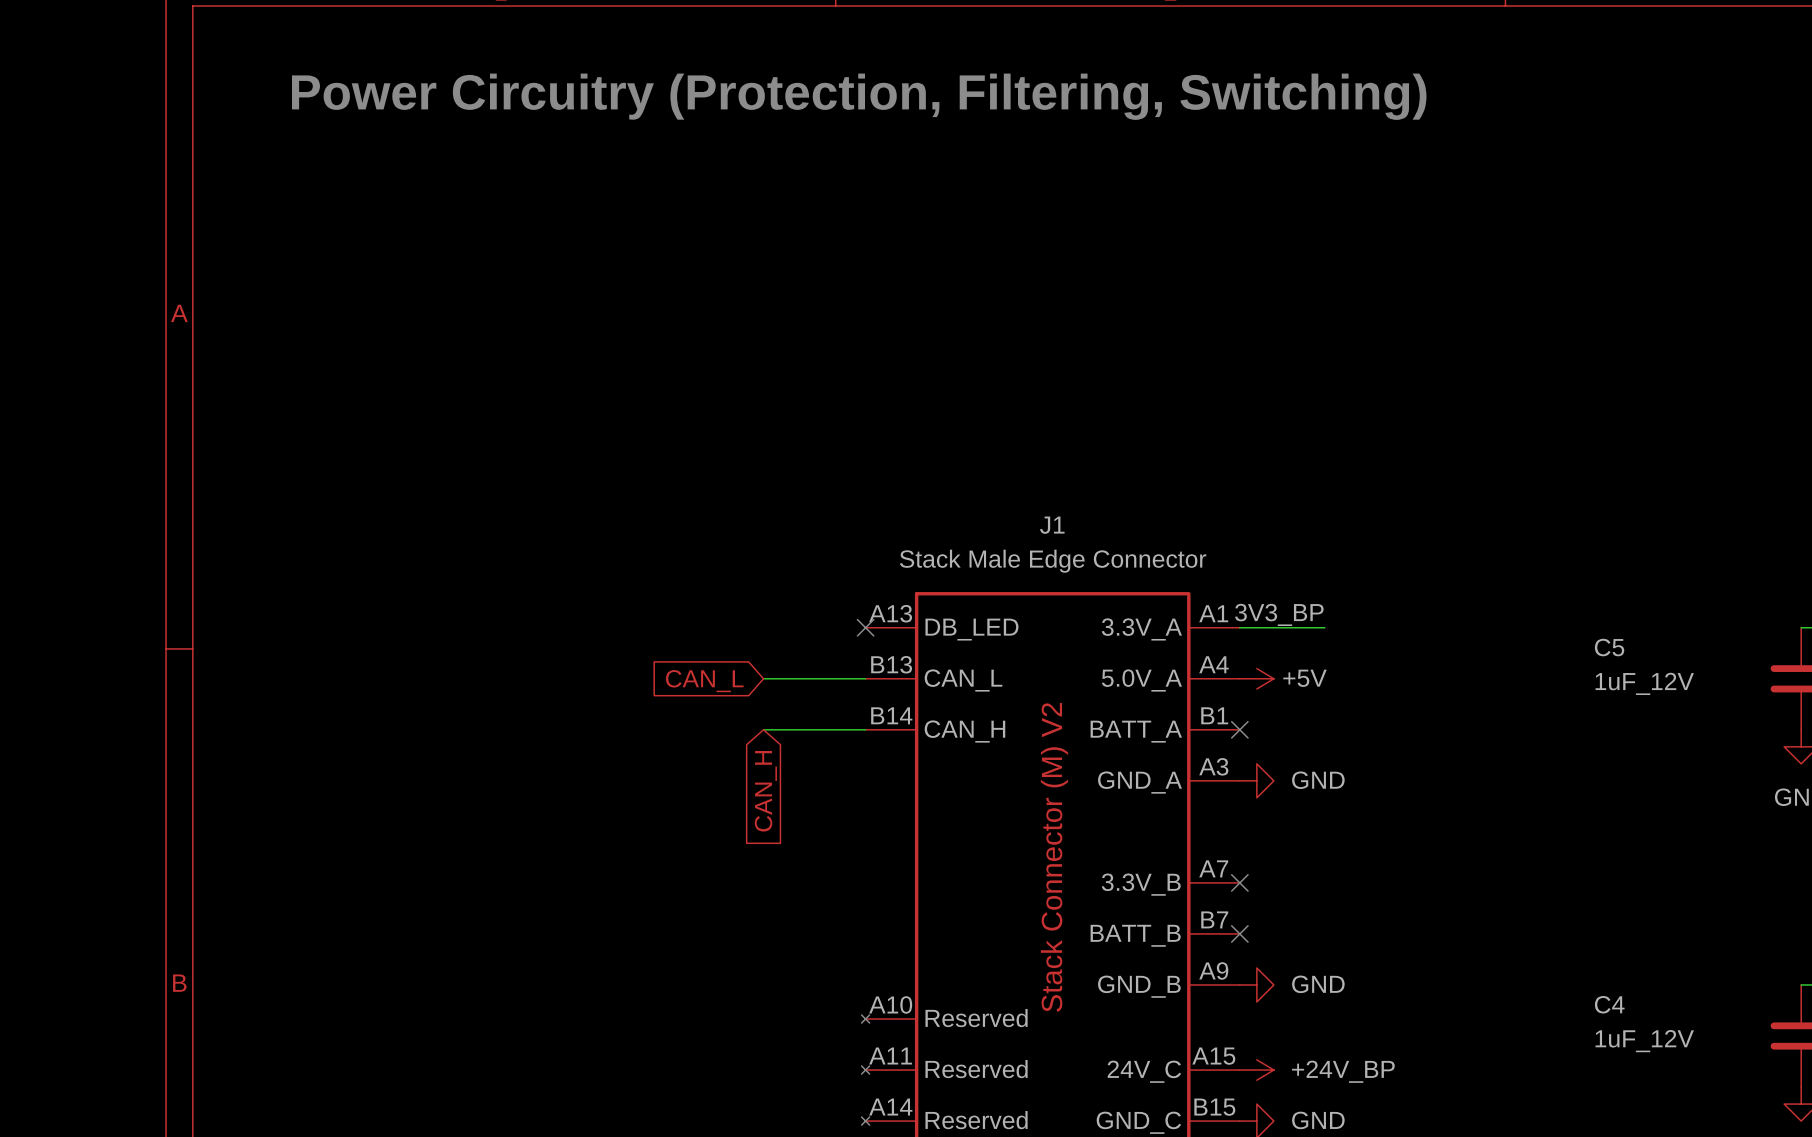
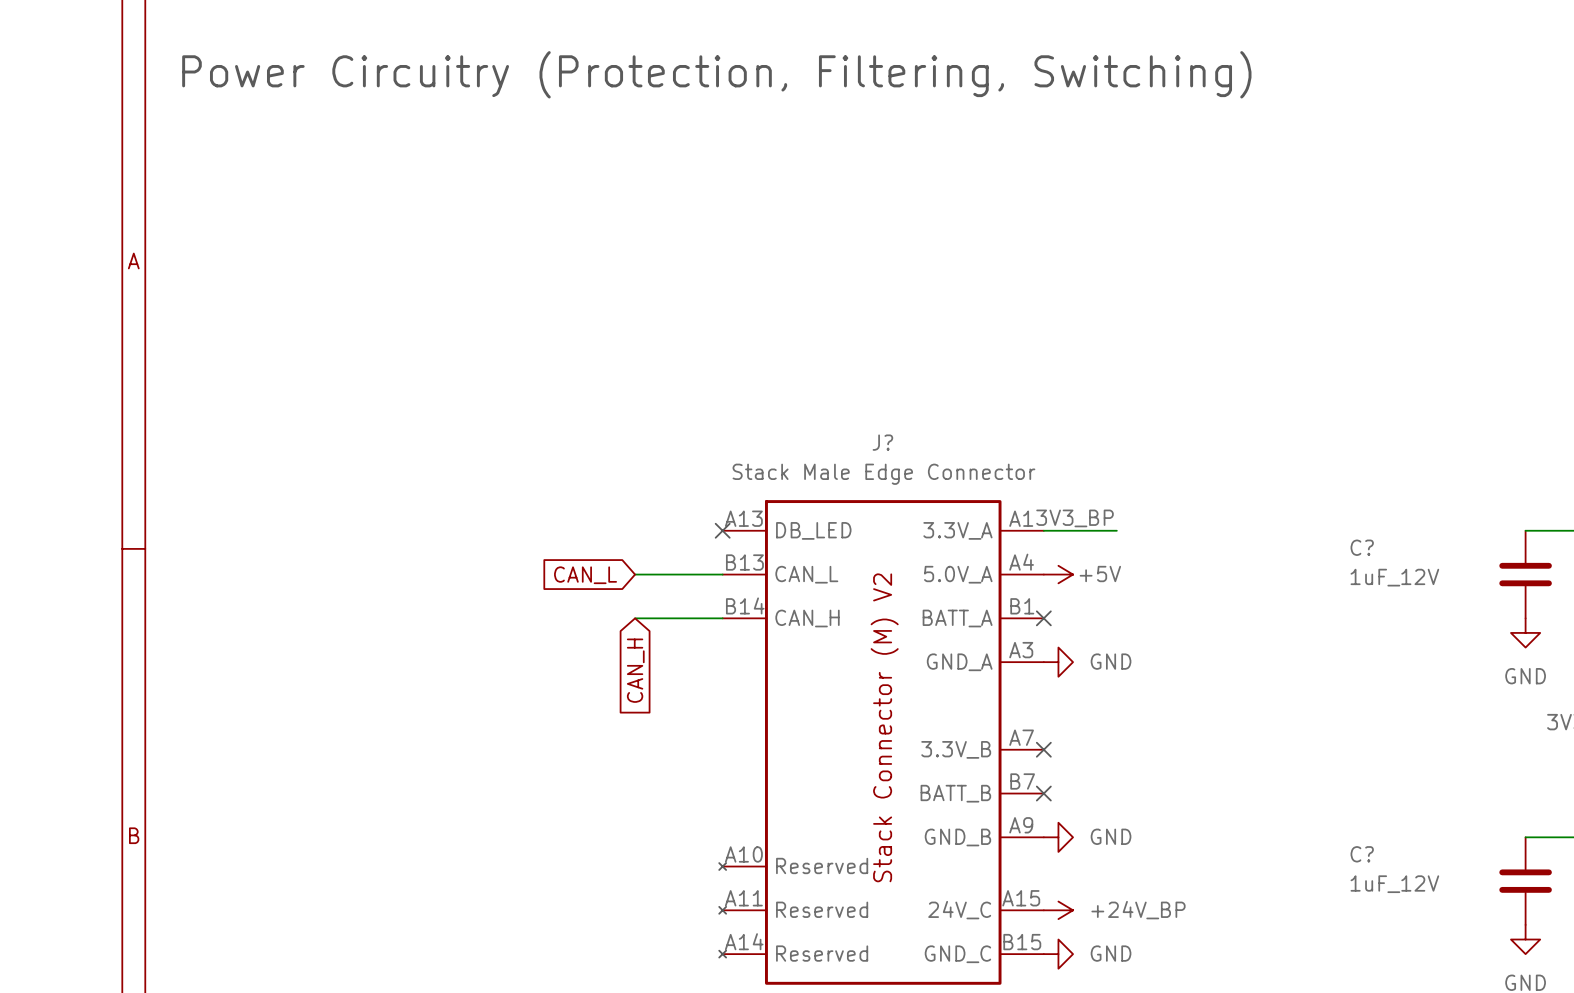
J1 name: J1 (1052, 525) -> J? (882, 442)
C5 name: C5 (1609, 647) -> C? (1362, 547)
C4 name: C4 (1609, 1004) -> C? (1362, 854)

